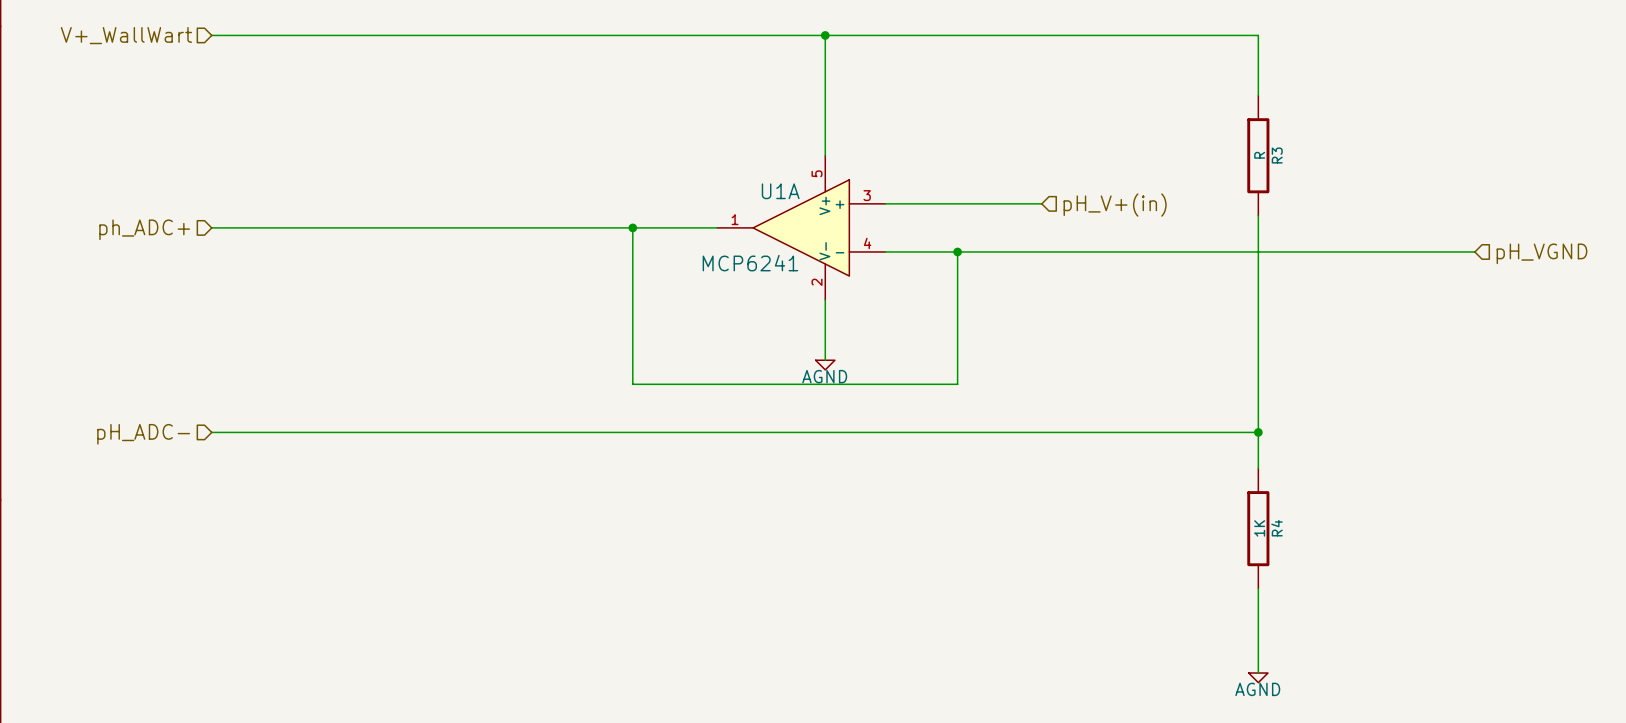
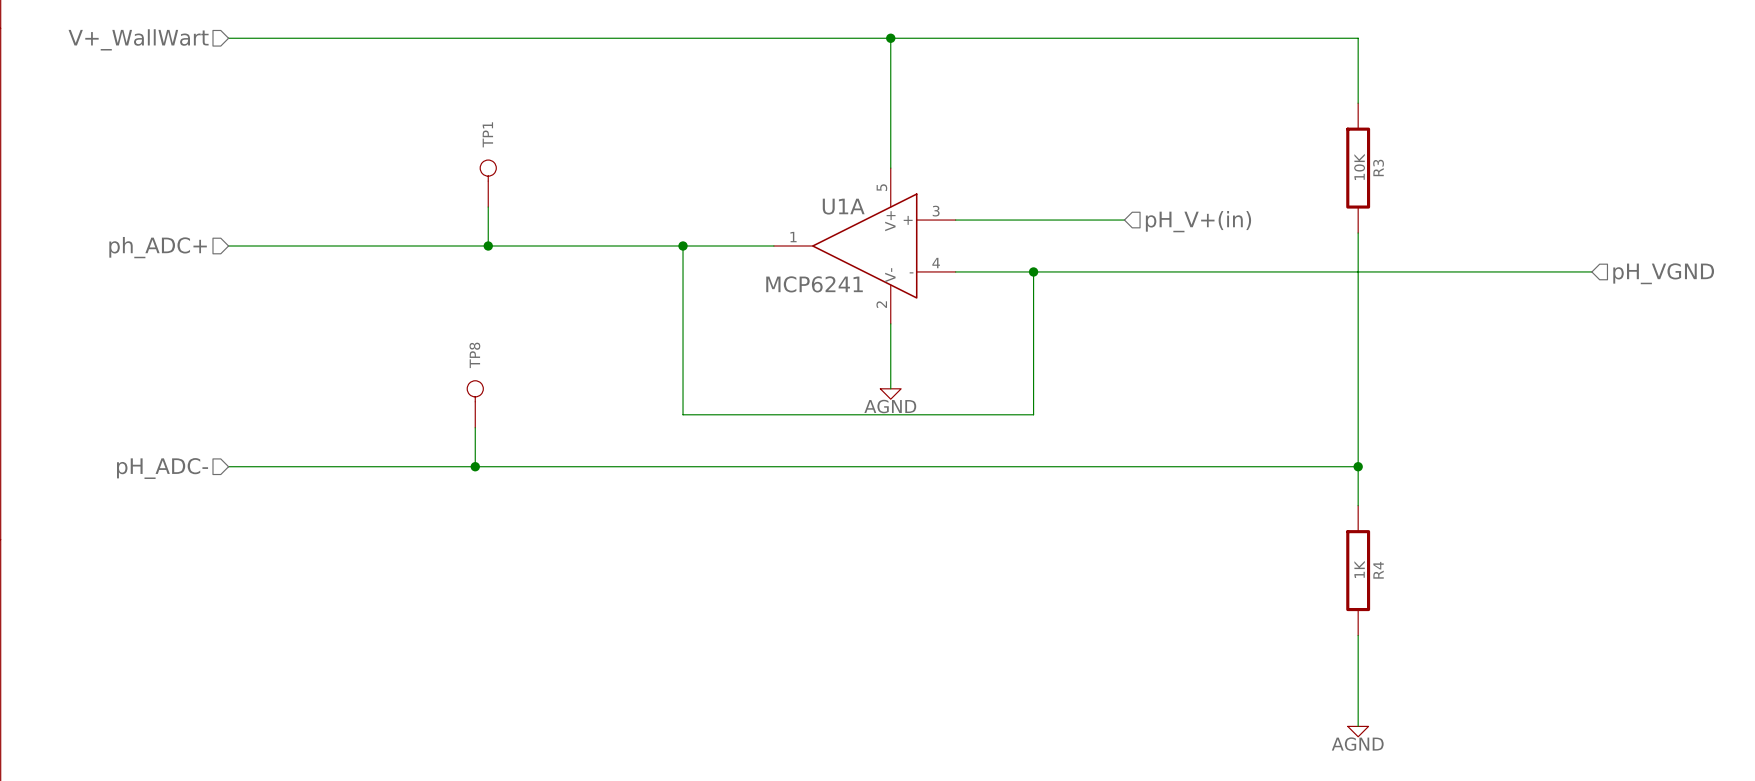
R3 value: R (1259, 155) -> 10K (1359, 166)
TP1: none -> (488, 183)
wire: none -> (488, 207) (488, 246)
junction: none -> (488, 246)
TP8: none -> (475, 404)
wire: none -> (475, 427) (475, 466)
junction: none -> (475, 466)

